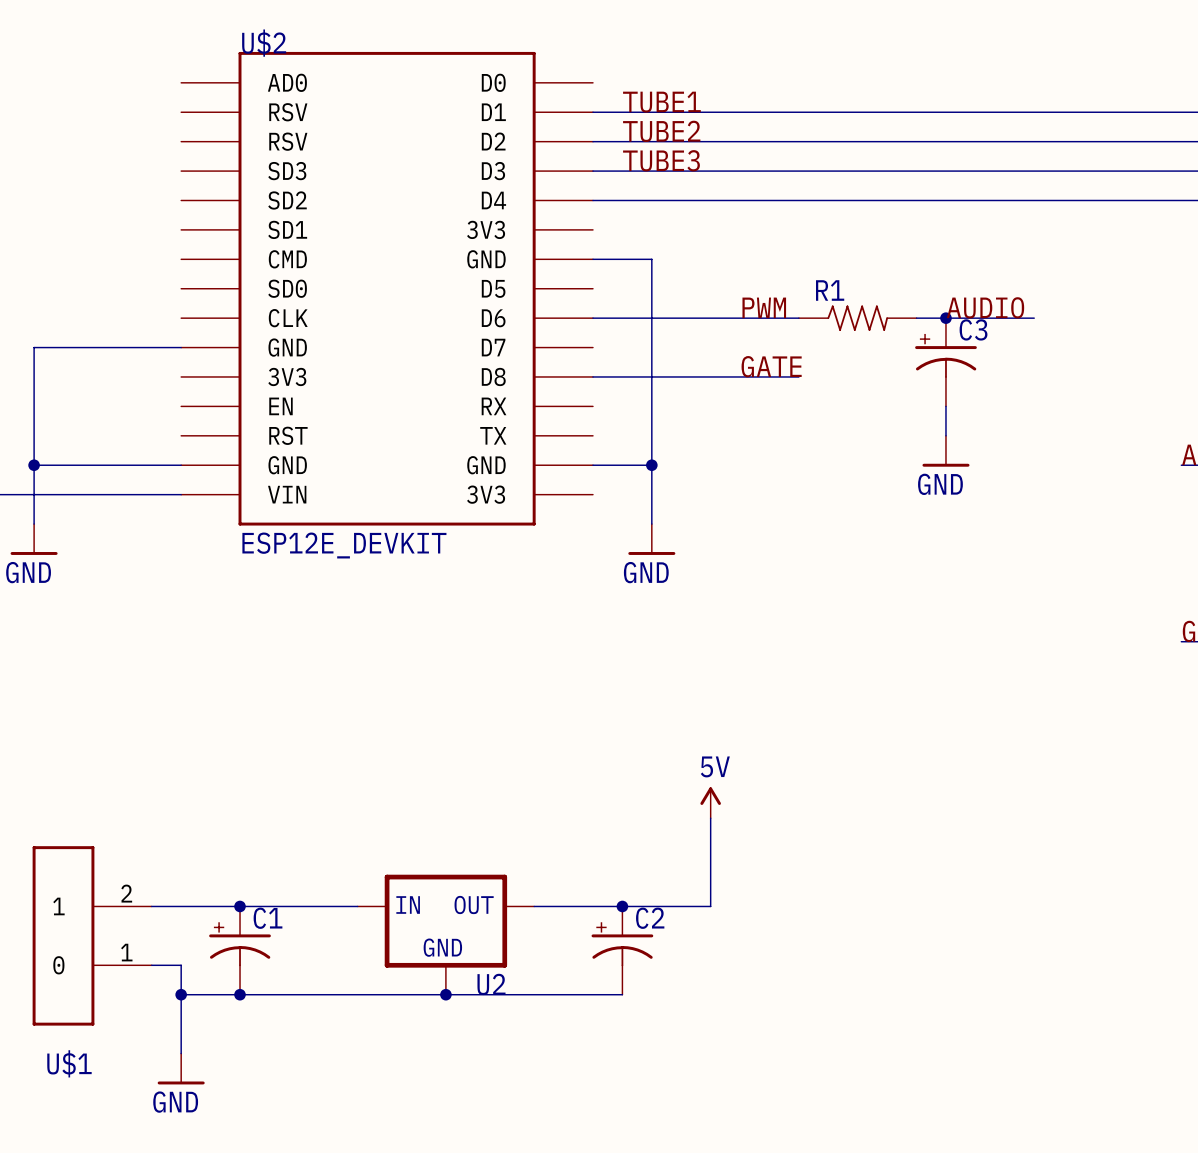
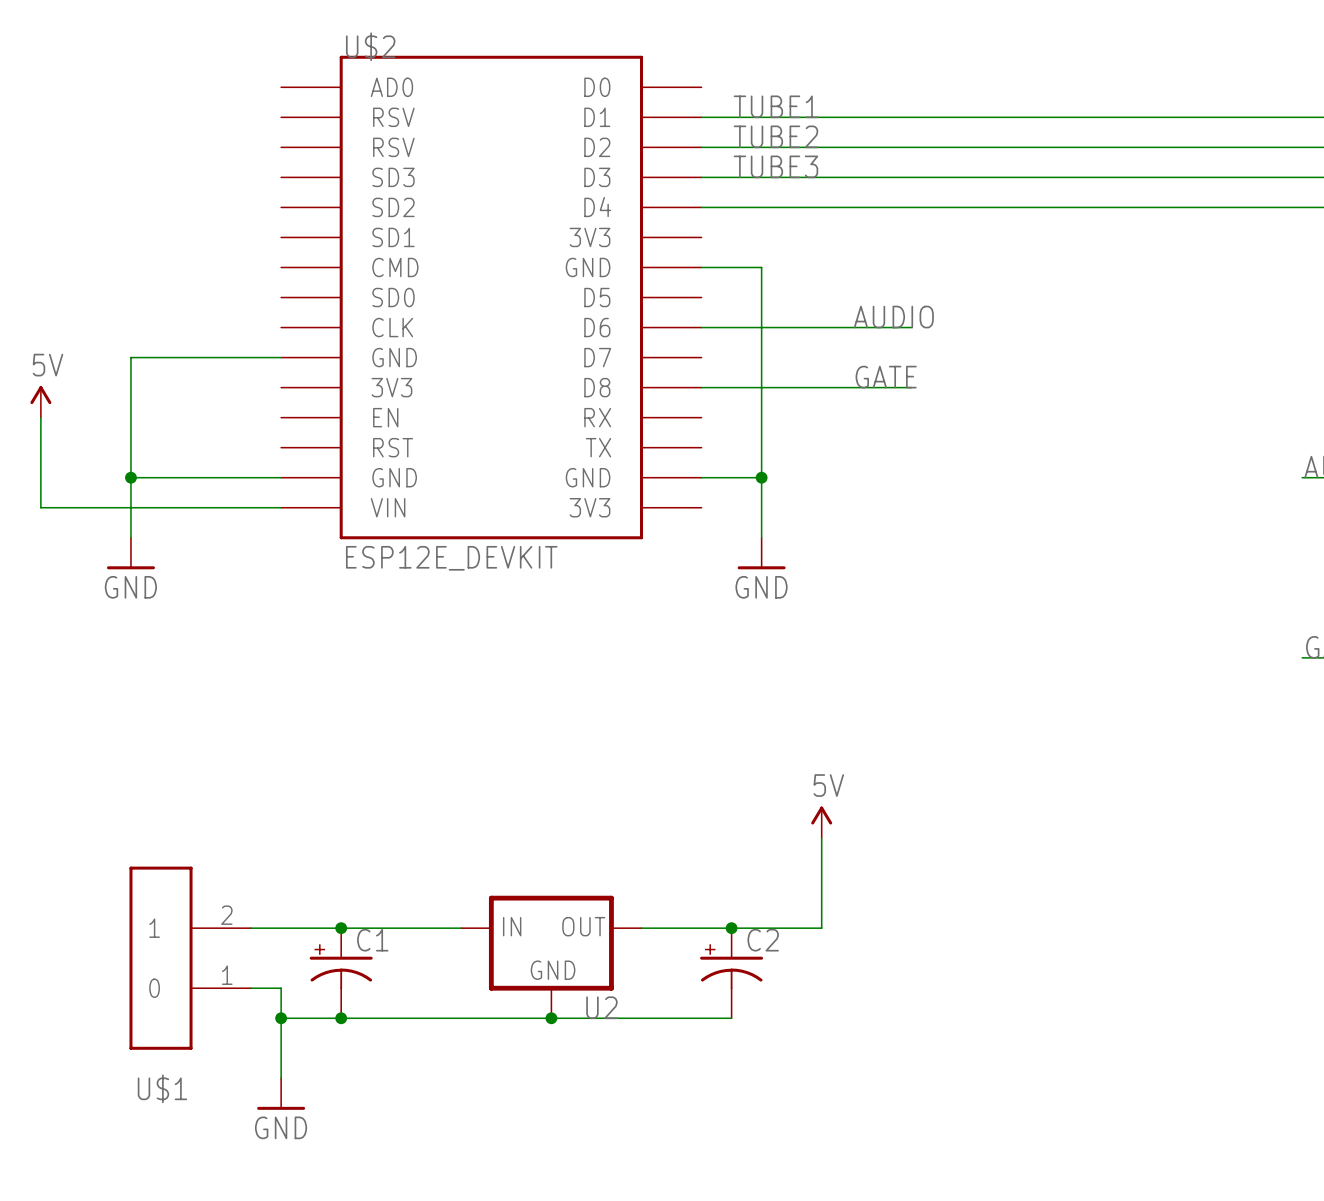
label: PWM (764, 307) -> AUDIO (893, 317)
label: AUDIO (985, 307) -> none
R1: (857, 318) -> none
wire: (916, 318) (1034, 318) -> none
junction: (945, 318) -> none
C3: (945, 362) -> none
wire: (945, 406) (945, 435) -> none
power symbol: GND (945, 451) -> none

